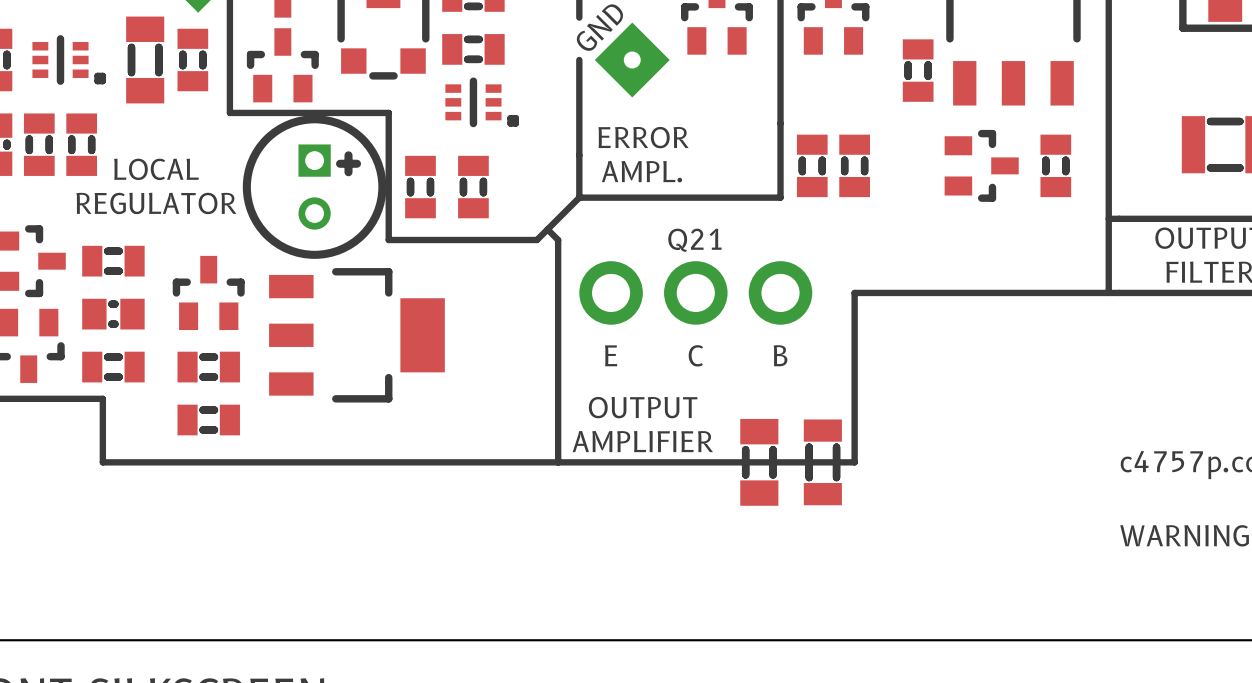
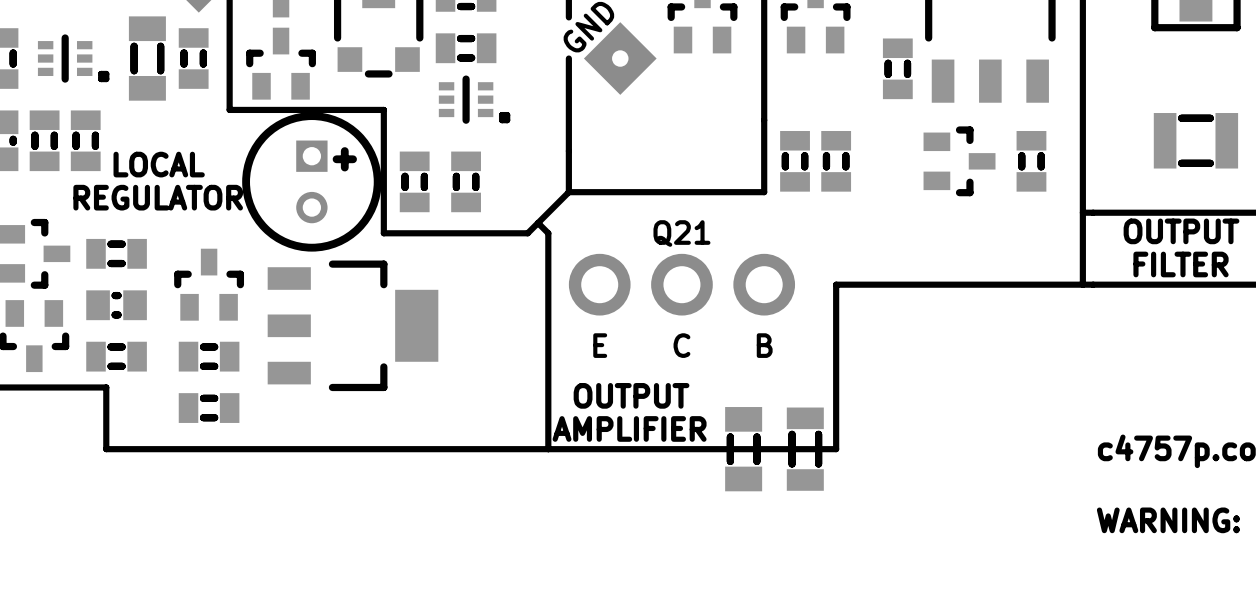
text: ERROR (643, 137) -> none
text: AMPL. (642, 171) -> none

